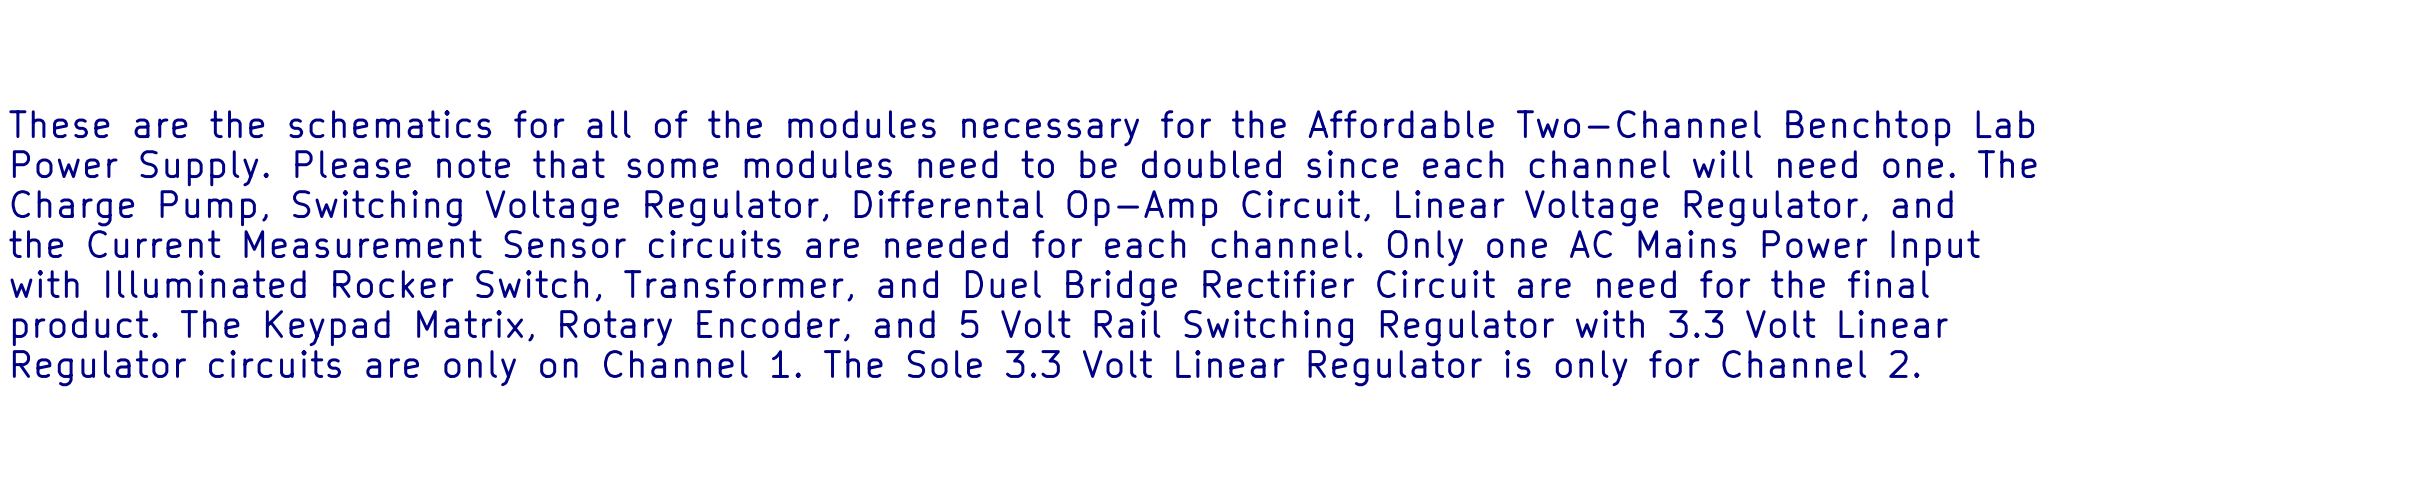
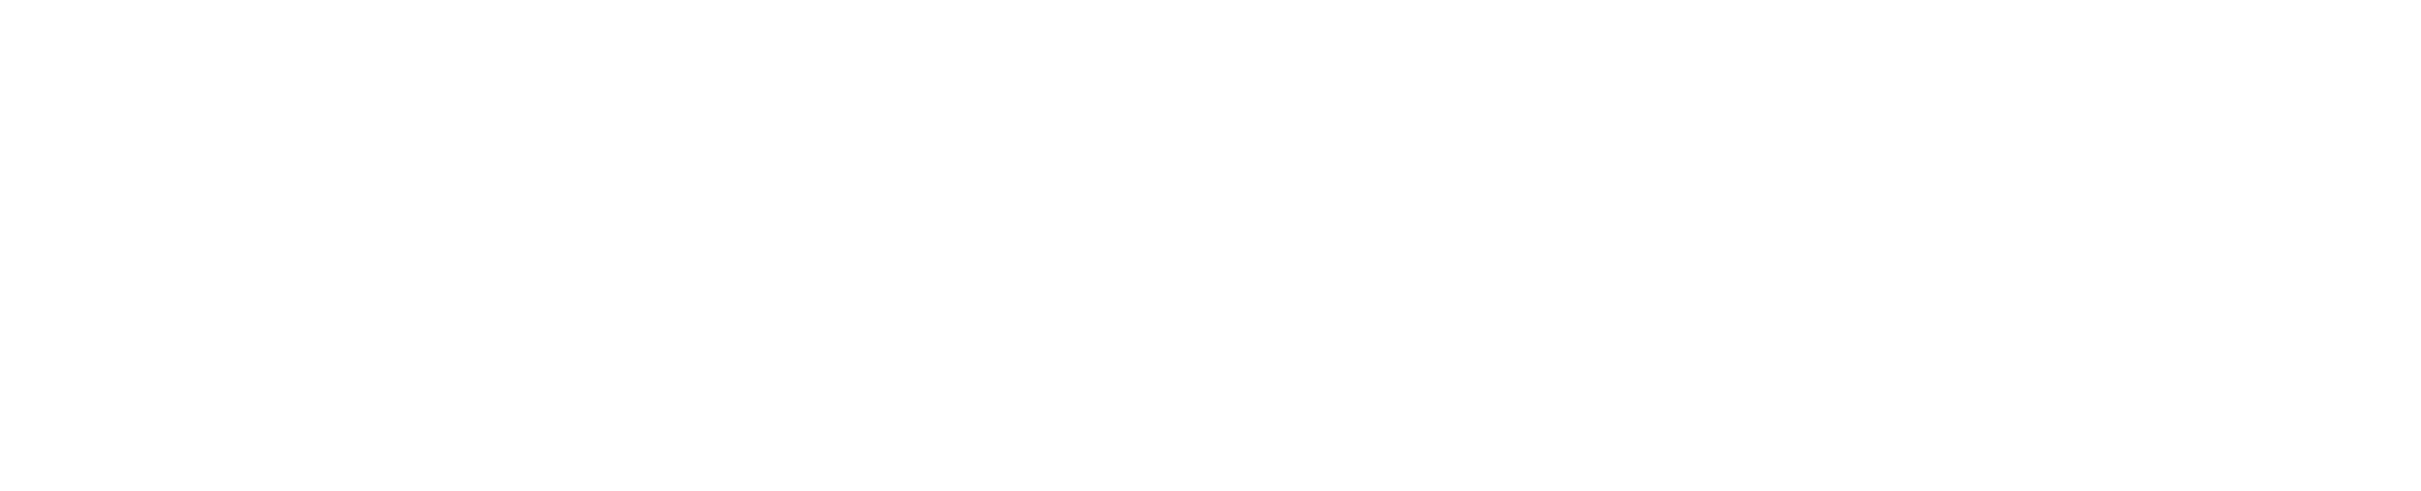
text: These are the schematics for all of the modules necessary for the Affordable Two-Channel Benchtop Lab (1021, 128) -> none
text: Power Supply. Please note that some modules need to be doubled since each channel will need one. The (1024, 168) -> none
text: Charge Pump, Switching Voltage Regulator, Differental Op-Amp Circuit, Linear Voltage Regulator, and (982, 208) -> none
text: the Current Measurement Sensor circuits are needed for each channel. Only one AC Mains Power Input (994, 248) -> none
text: with Illuminated Rocker Switch, Transformer, and Duel Bridge Rectifier Circuit are need for the final (969, 288) -> none
text: product. The Keypad Matrix, Rotary Encoder, and 5 Volt Rail Switching Regulator with 3.3 Volt Linear (980, 328) -> none
text: Regulator circuits are only on Channel 1. The Sole 3.3 Volt Linear Regulator is only for Channel 2. (966, 368) -> none

